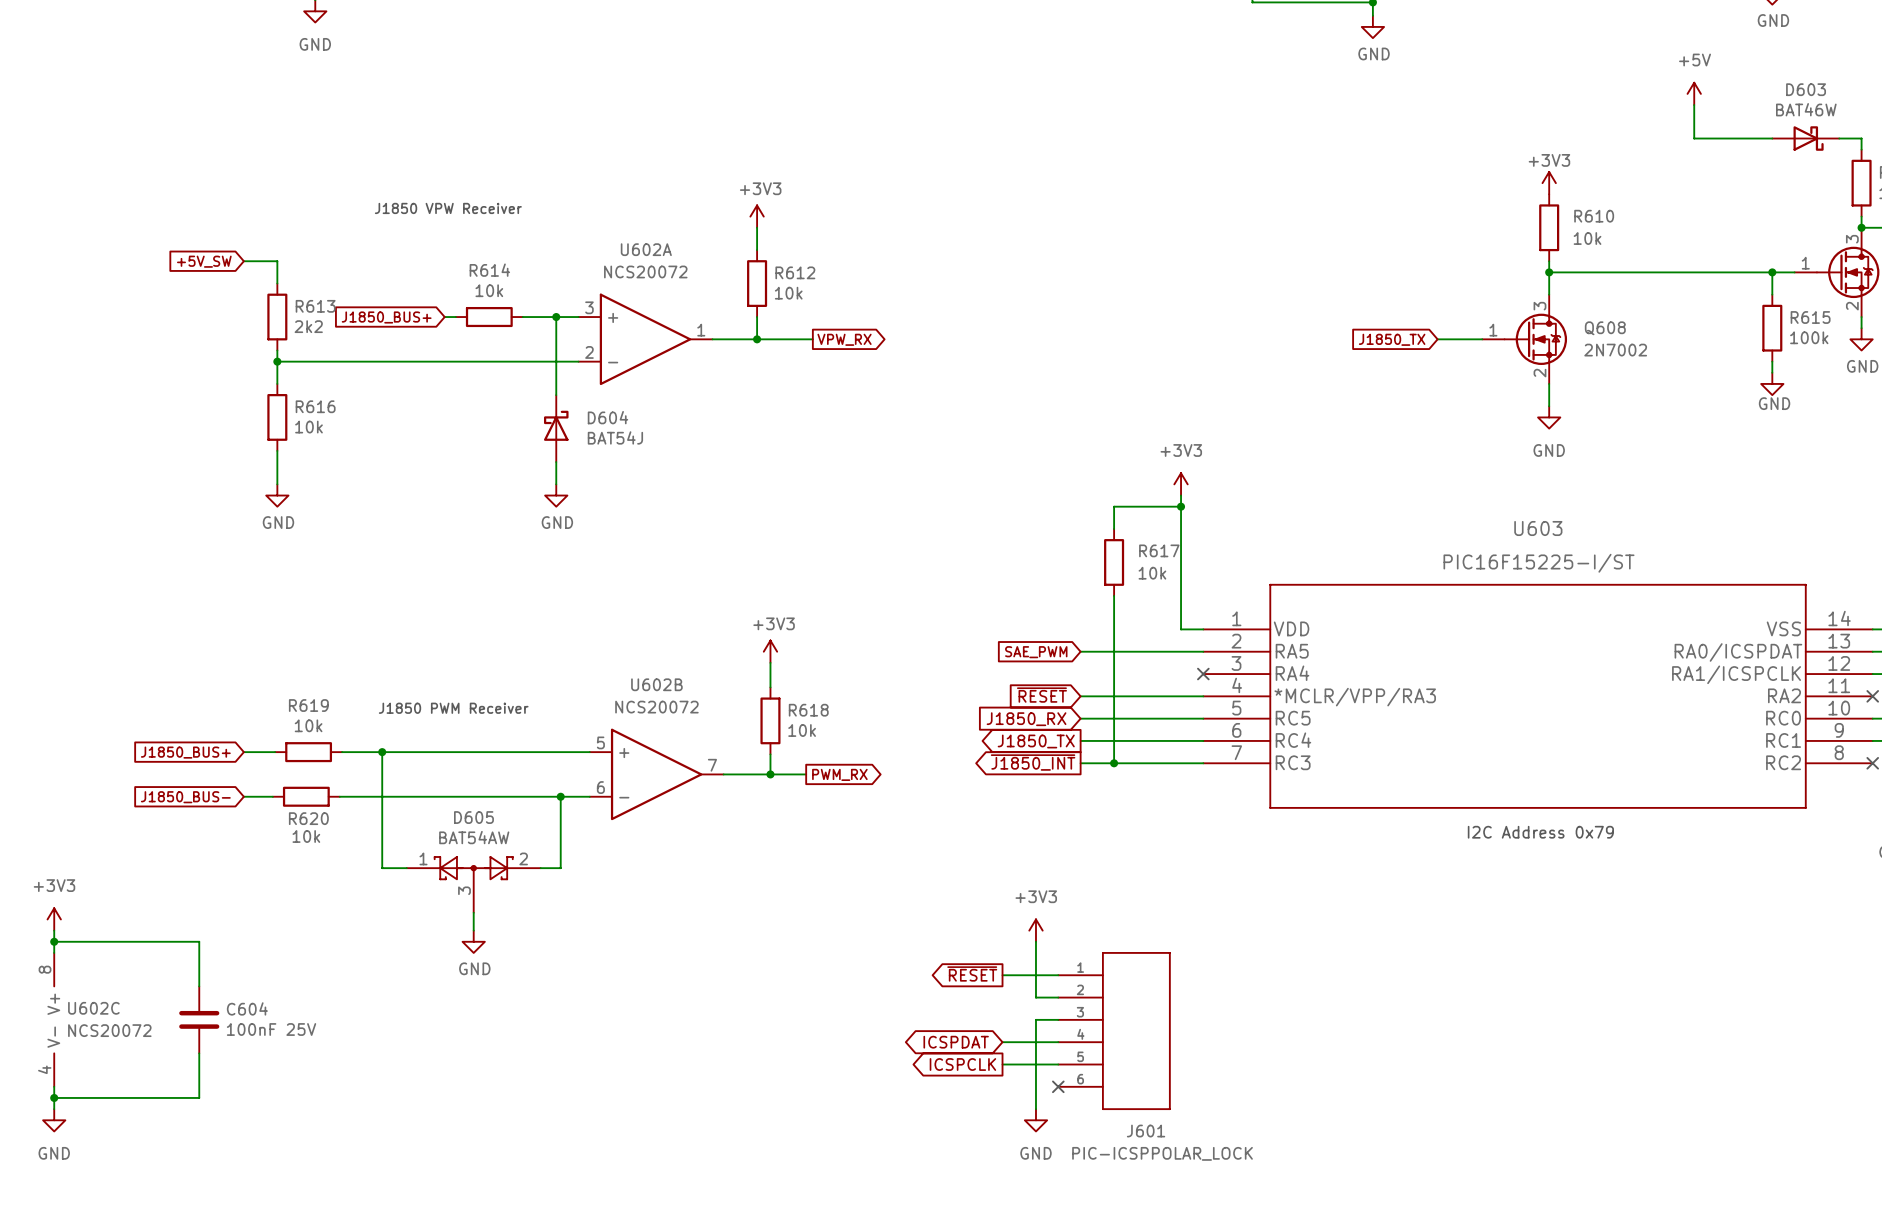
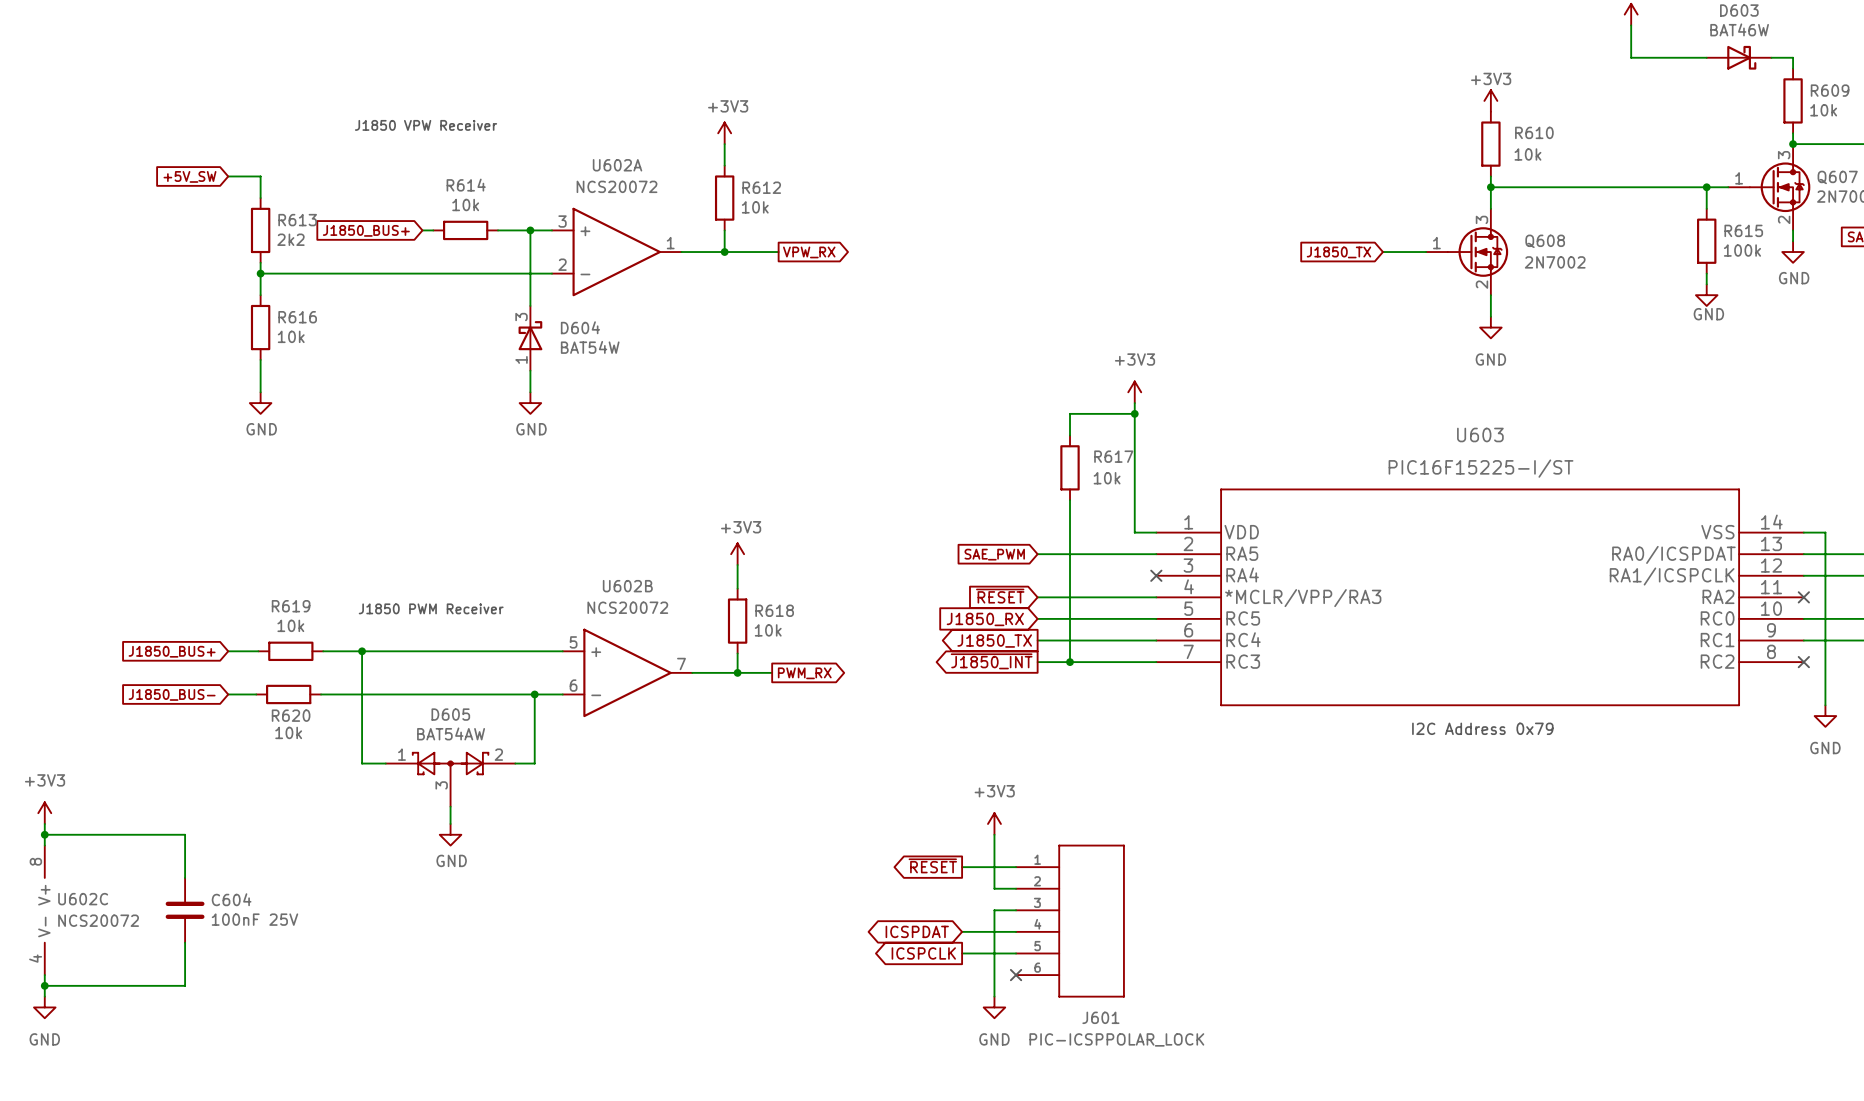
D604 pin number: none -> 3 (521, 317)
D604 value: BAT54J (615, 437) -> BAT54W (590, 347)
D604 pin number: none -> 1 (521, 359)

